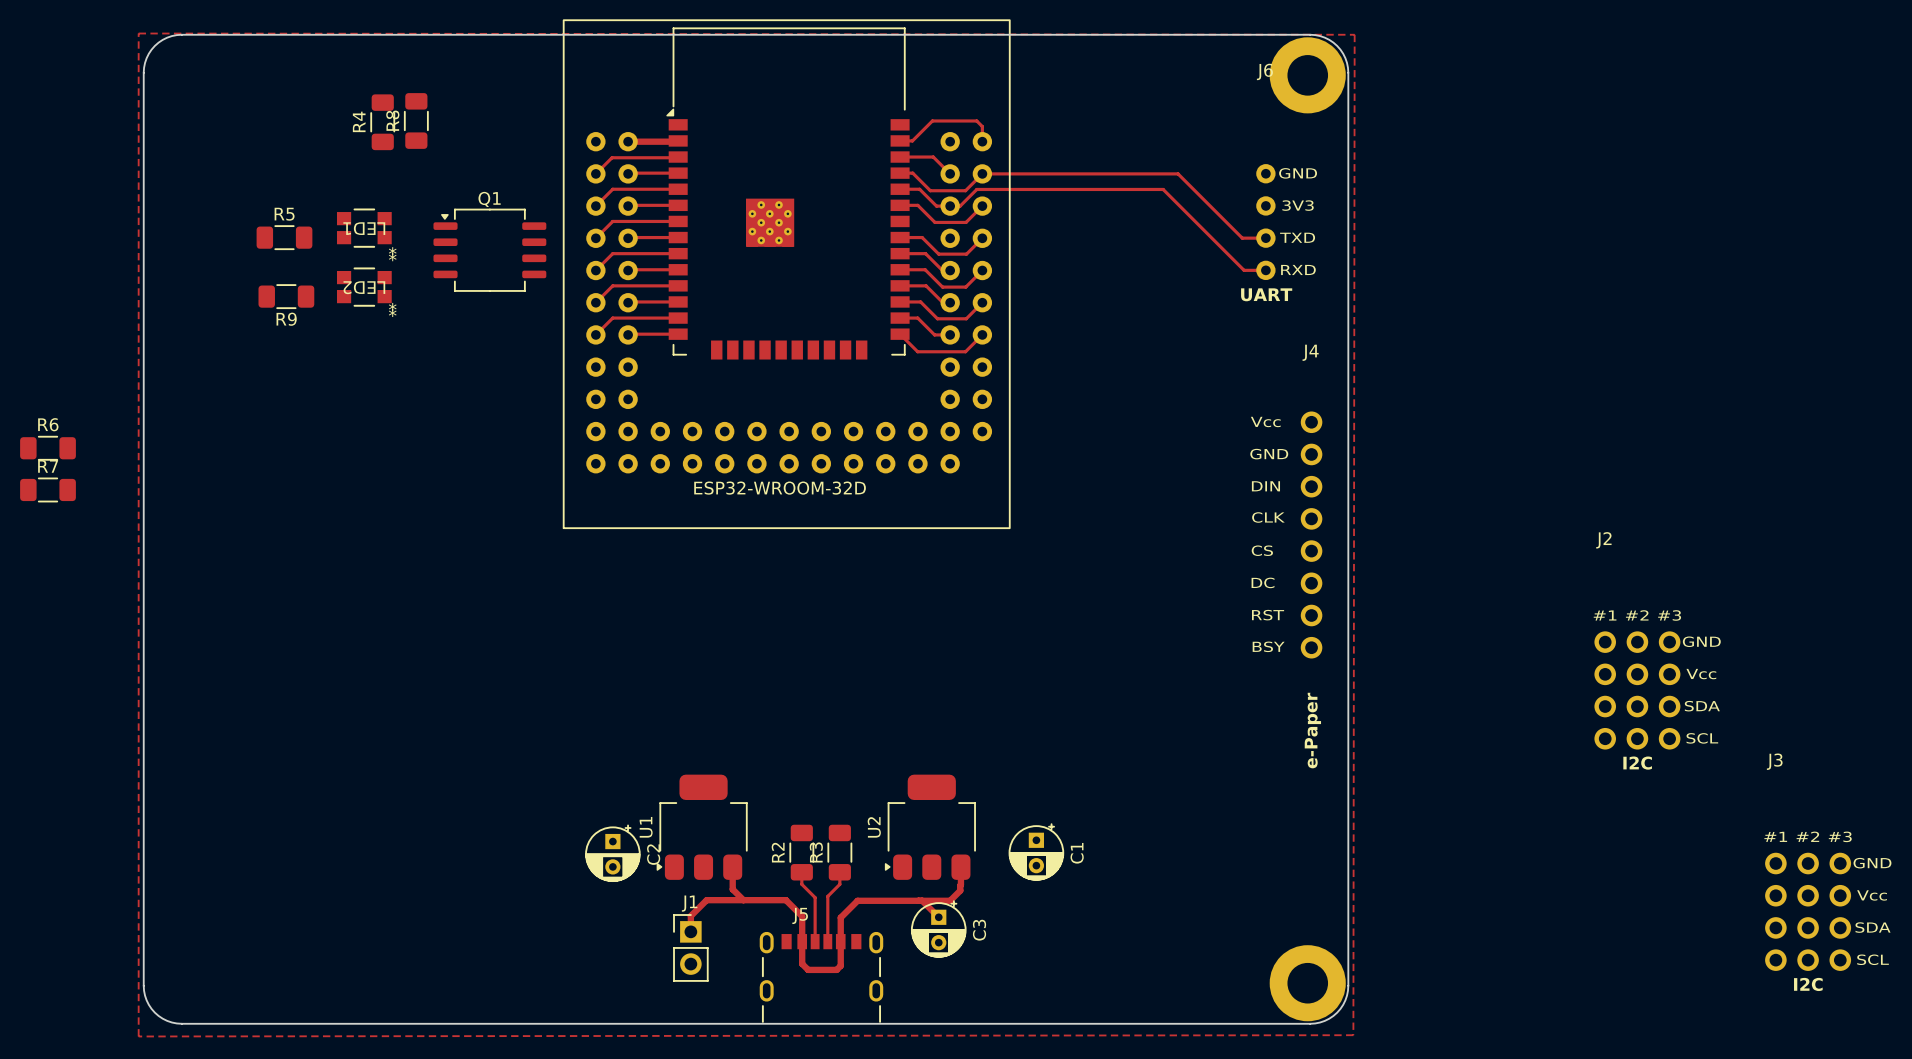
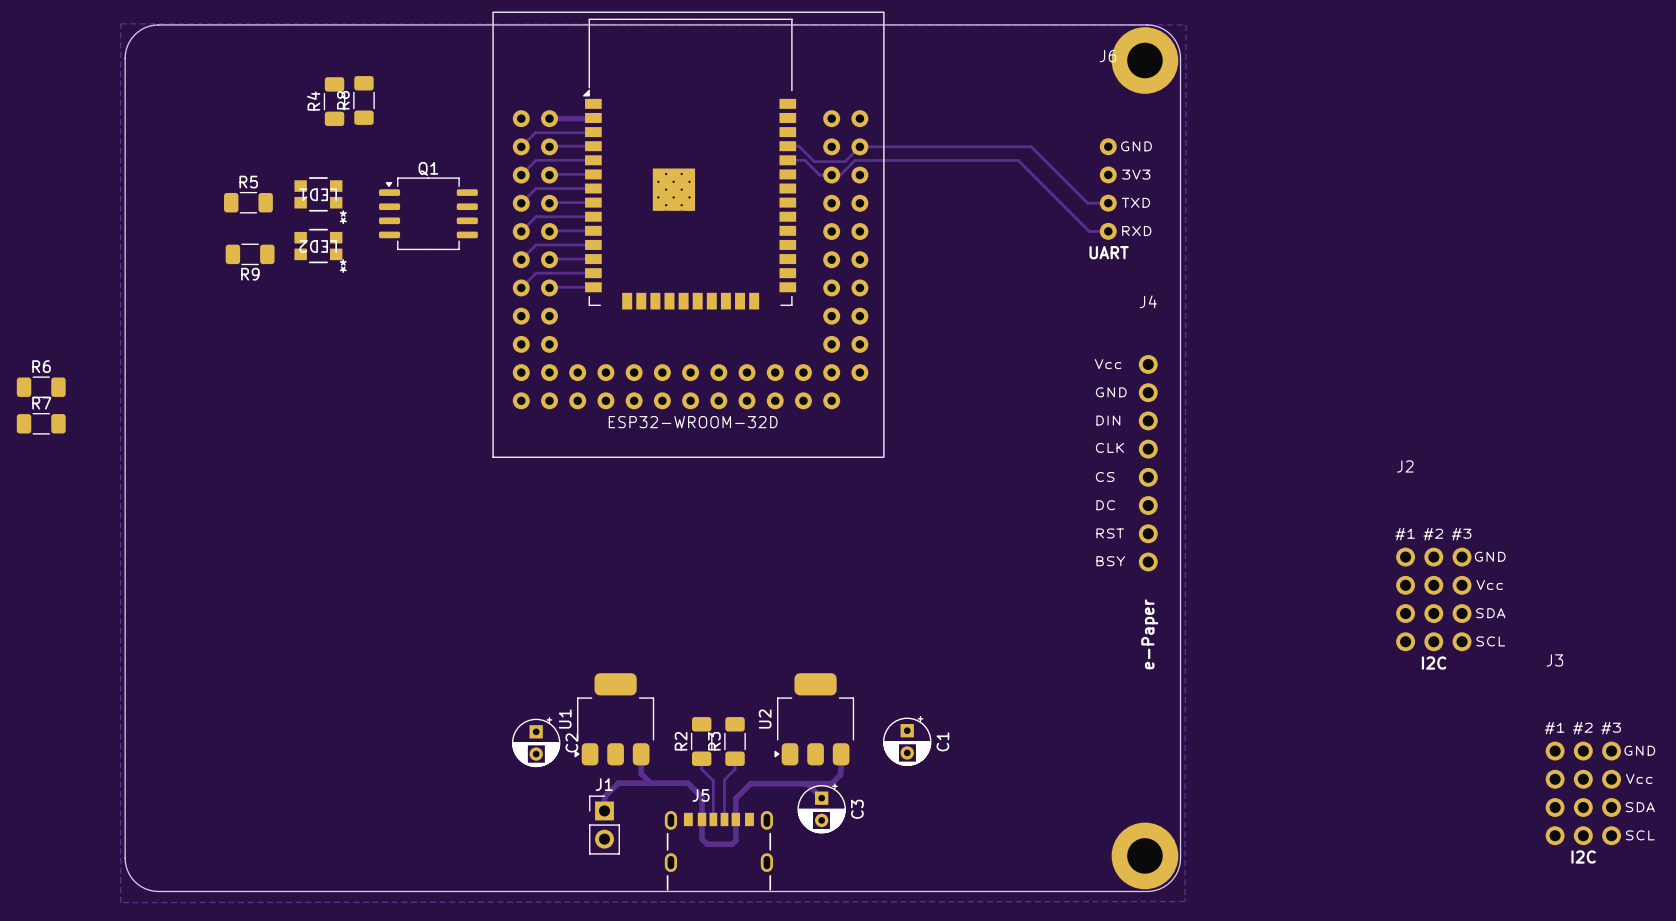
track: (900, 140) (912, 140) (932, 120) (976, 120) (982, 126) (982, 141) -> none
track: (900, 157) (933, 157) (950, 173) -> none
track: (900, 205) (917, 205) (934, 222) (966, 222) (982, 206) -> none
track: (900, 237) (922, 237) (938, 254) (966, 254) (982, 238) -> none
track: (900, 253) (925, 253) (942, 270) (950, 270) -> none
track: (900, 269) (925, 269) (942, 287) (965, 287) (982, 270) -> none
track: (900, 285) (926, 285) (942, 302) (950, 302) -> none
track: (900, 301) (920, 301) (937, 318) (966, 318) (982, 302) -> none
track: (900, 318) (917, 318) (934, 334) (950, 334) -> none
track: (900, 334) (917, 351) (965, 351) (982, 334) -> none

